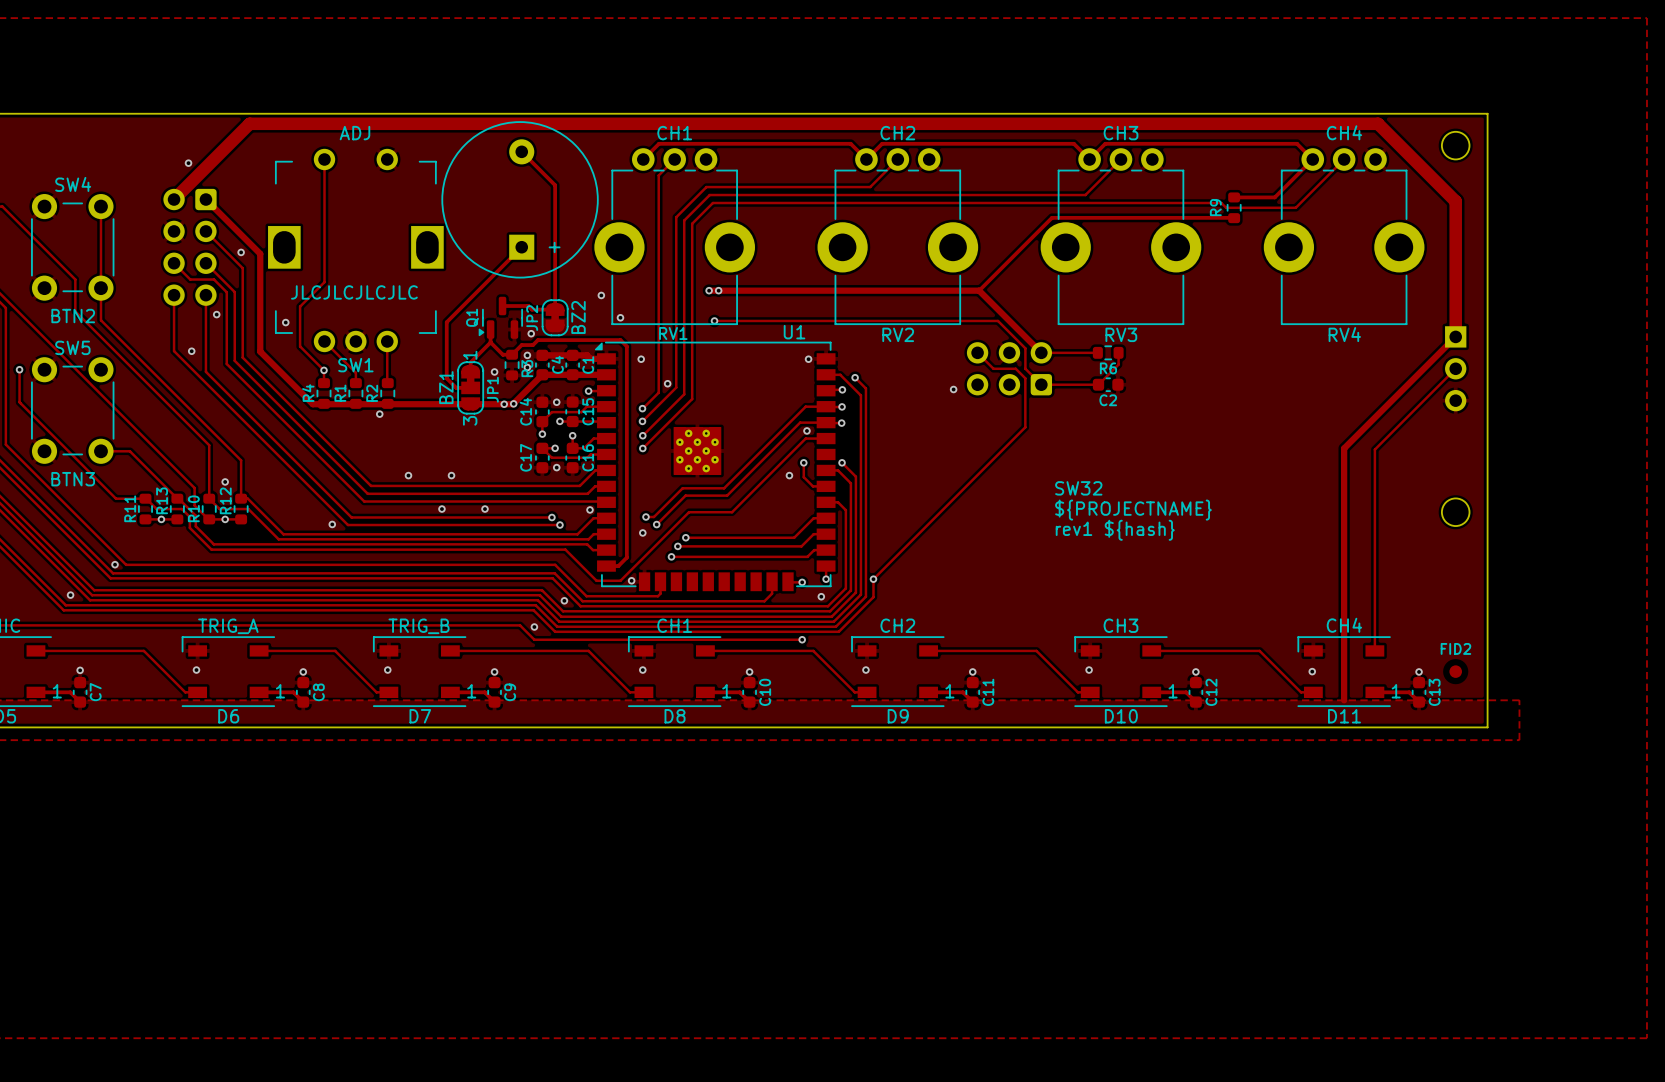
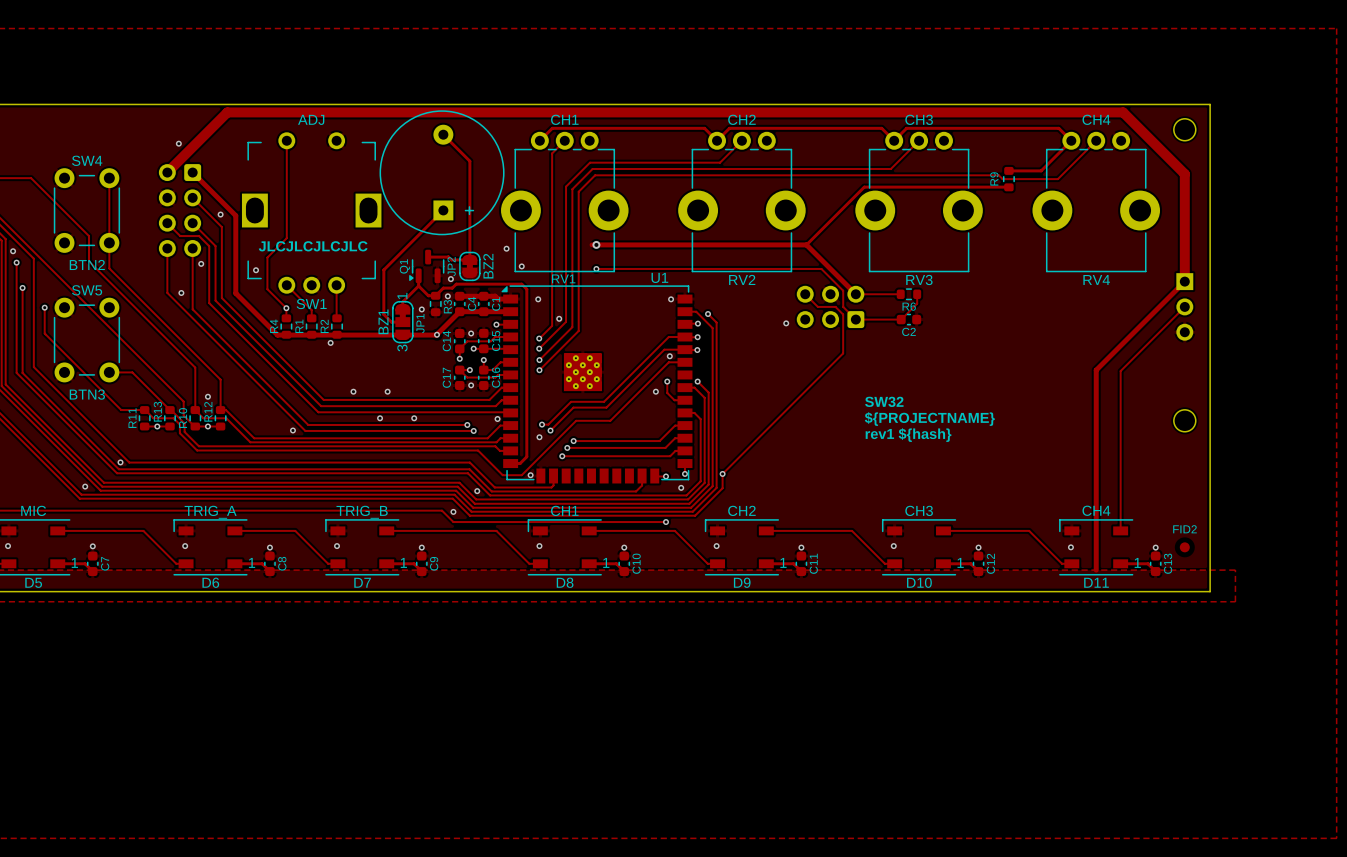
via: (709, 290) -> none
via: none -> (596, 244)
via: (718, 290) -> none
via: (527, 367) -> none
via: (504, 404) -> none

